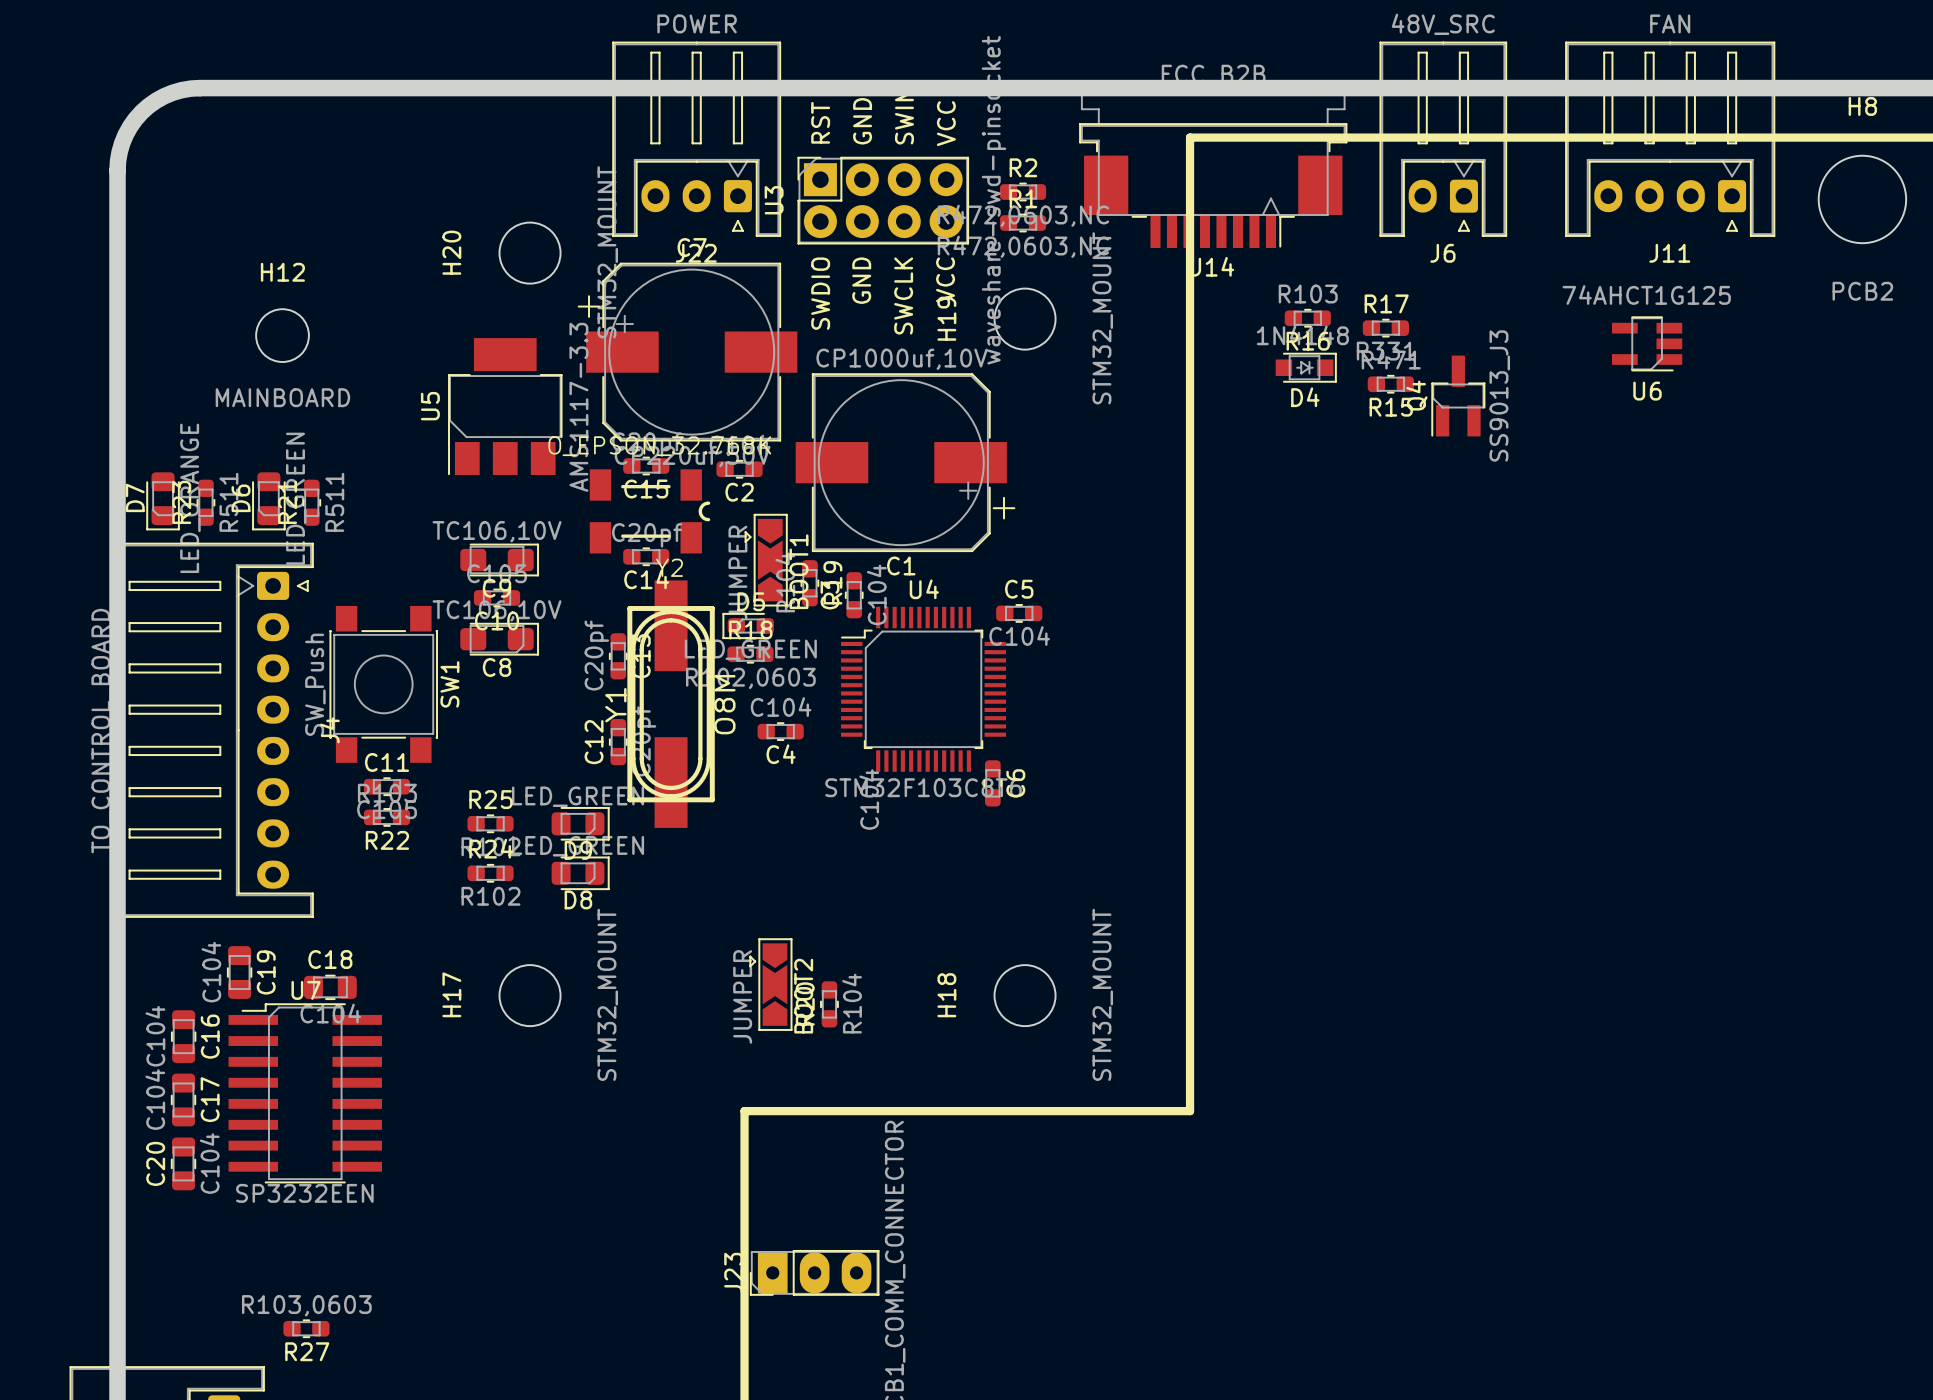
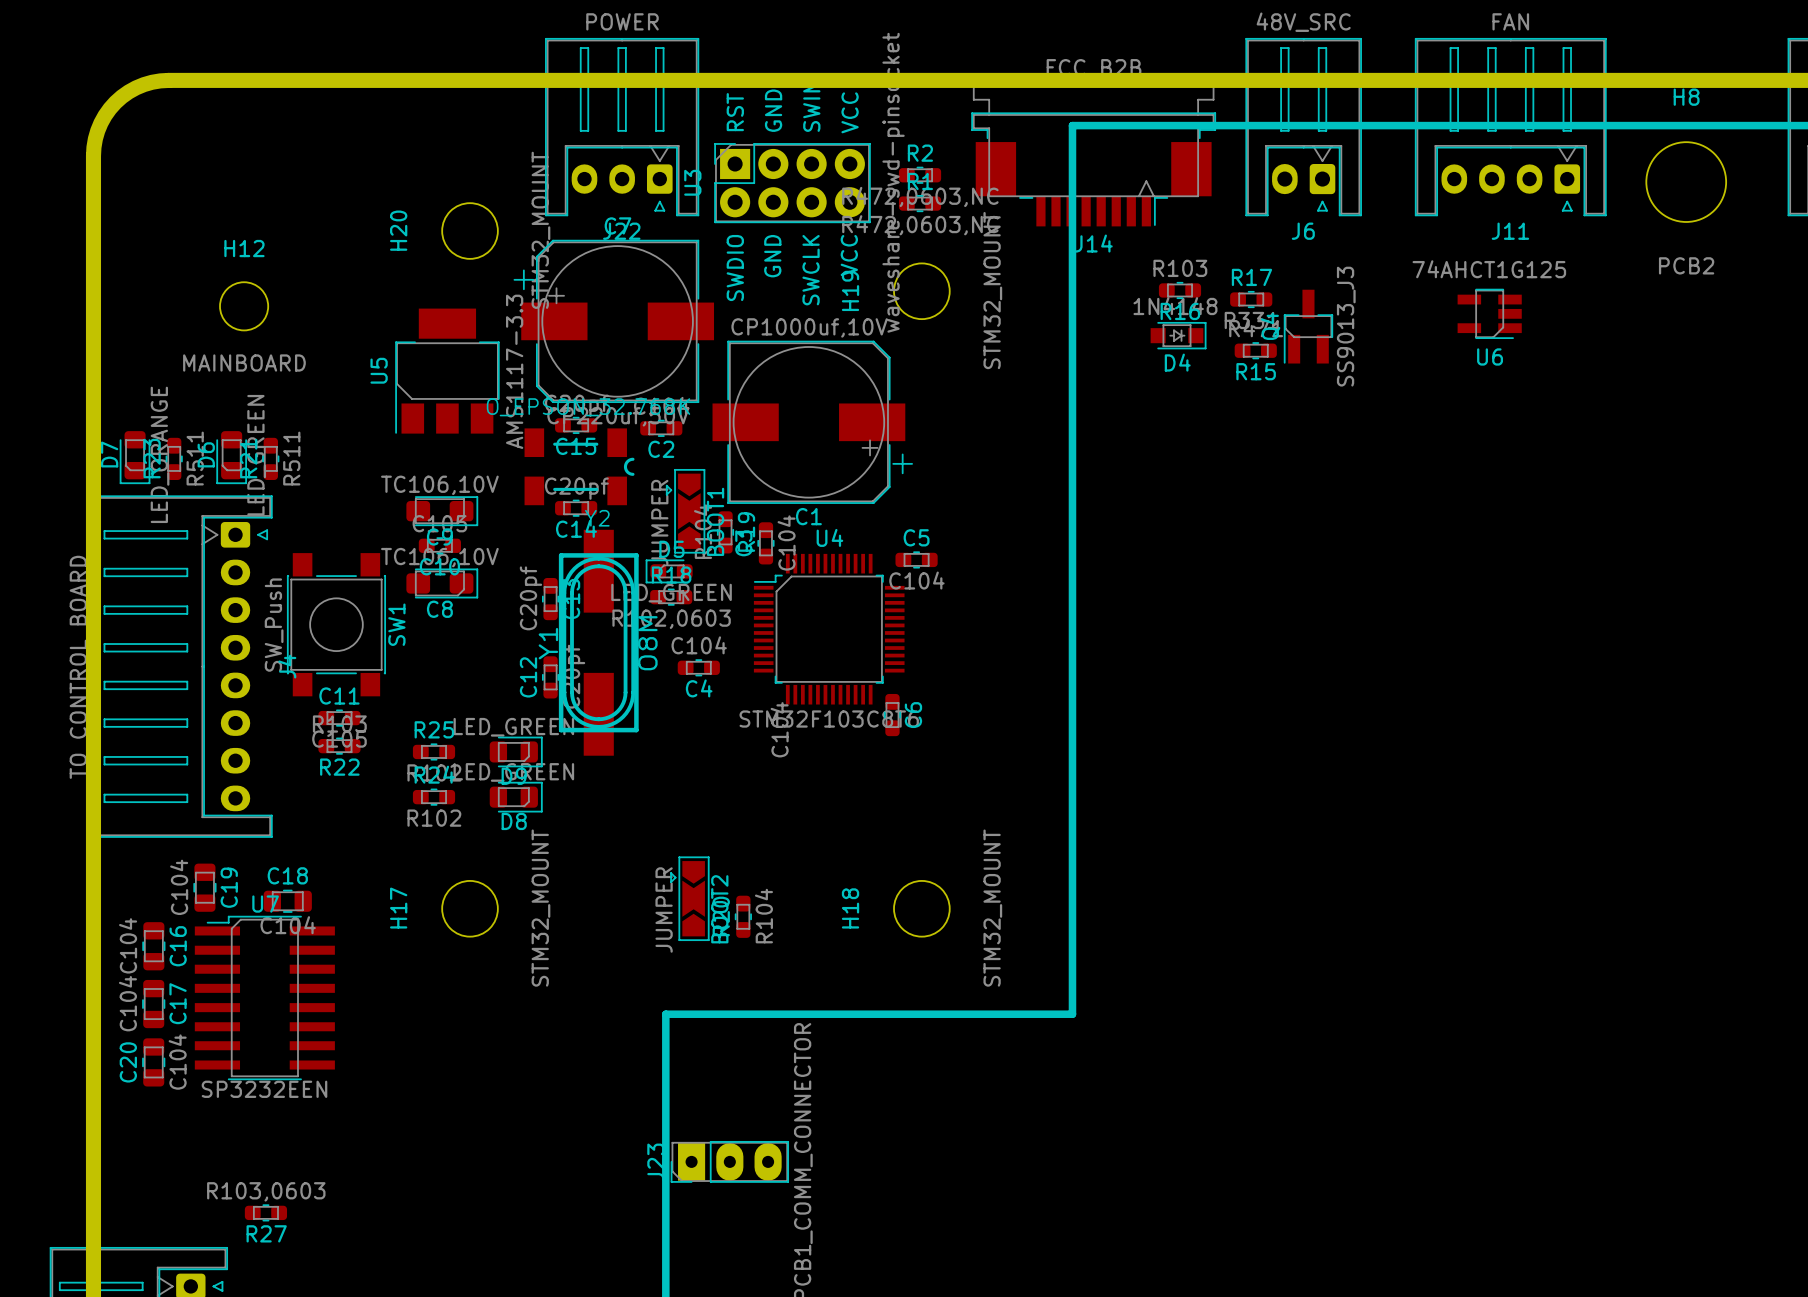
Q4 position: (1458, 396) -> (1308, 326)

